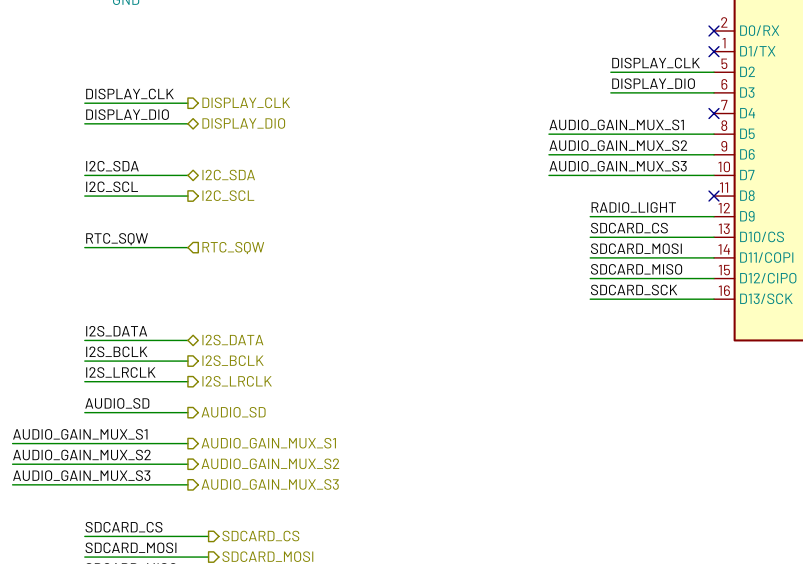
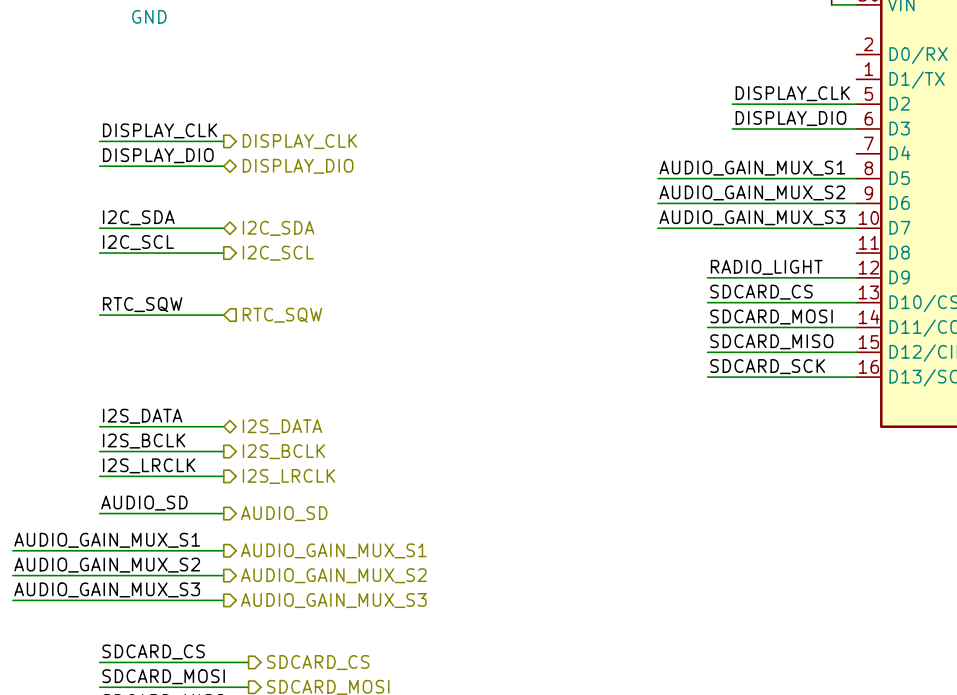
no-connect mark: (713, 31) -> none
no-connect mark: (713, 51) -> none
no-connect mark: (713, 113) -> none
no-connect mark: (713, 196) -> none

